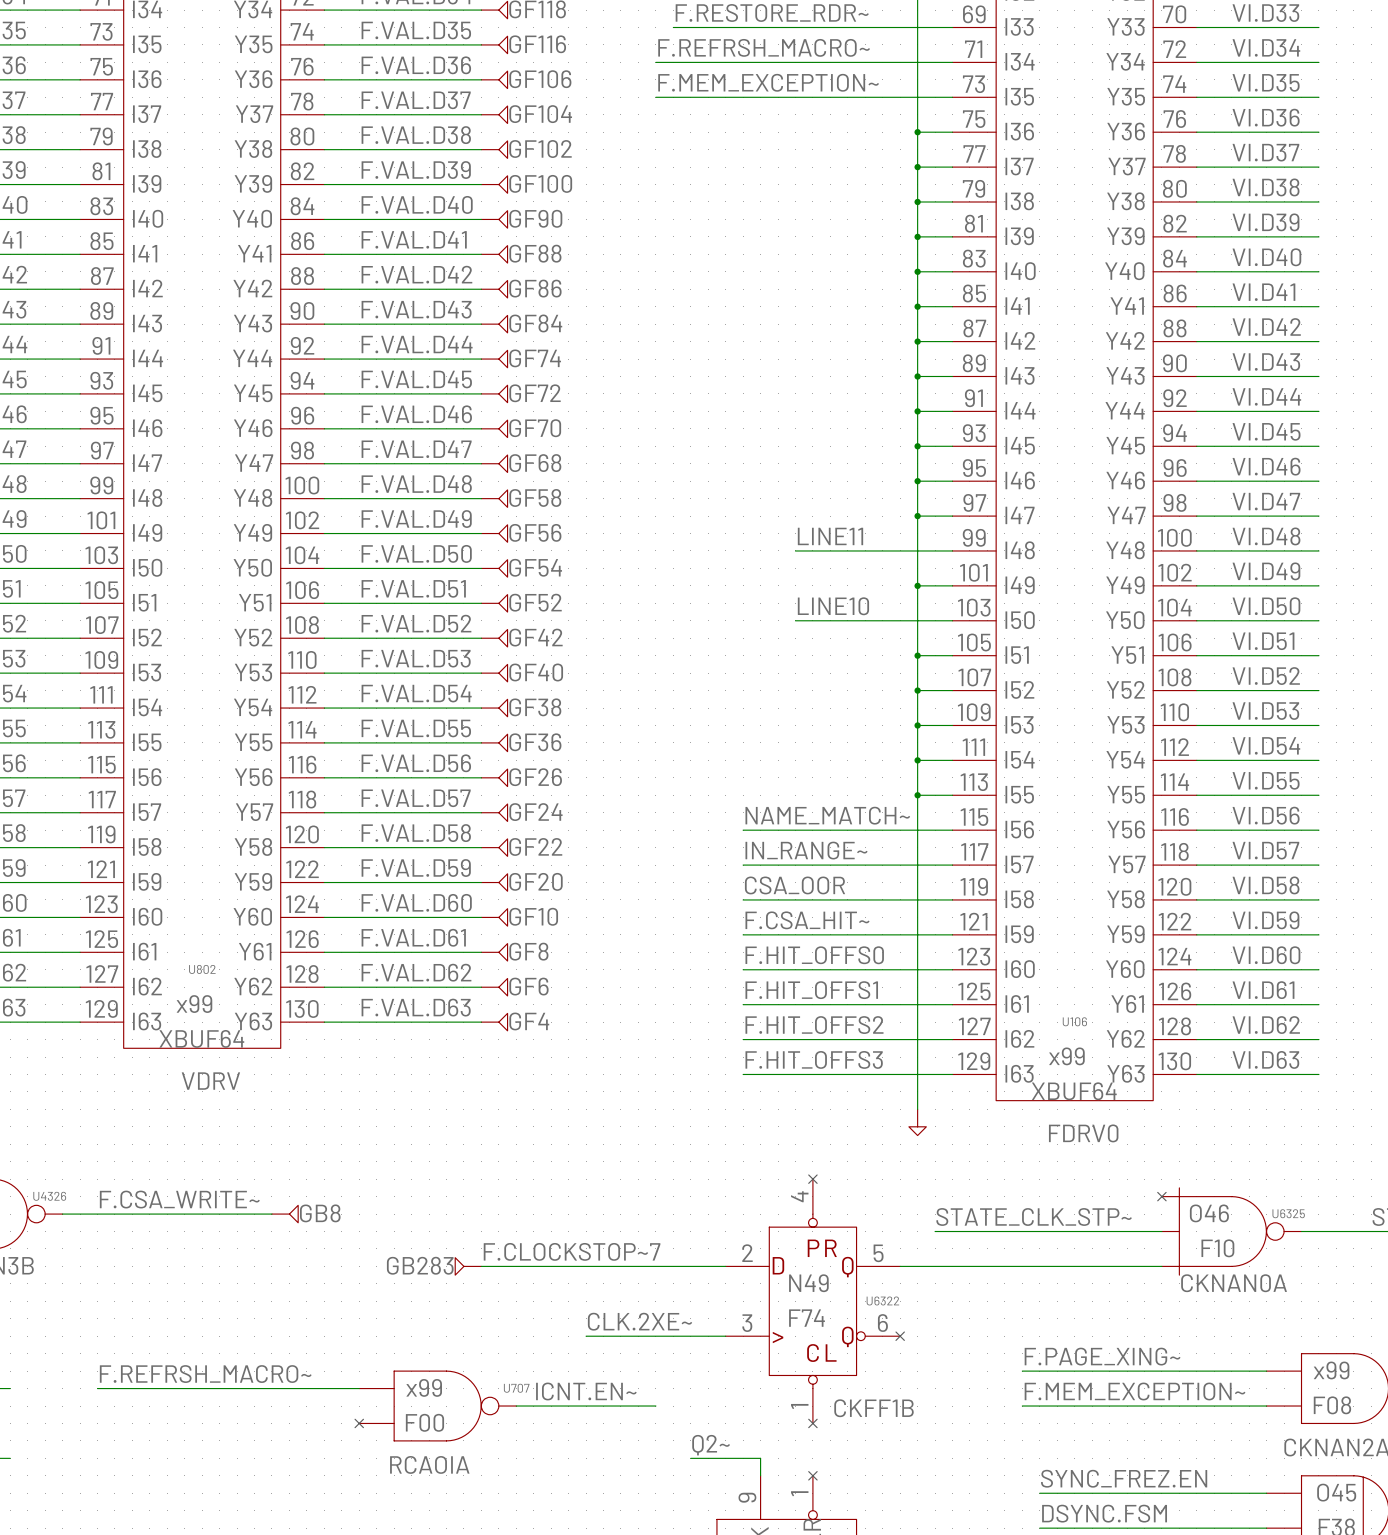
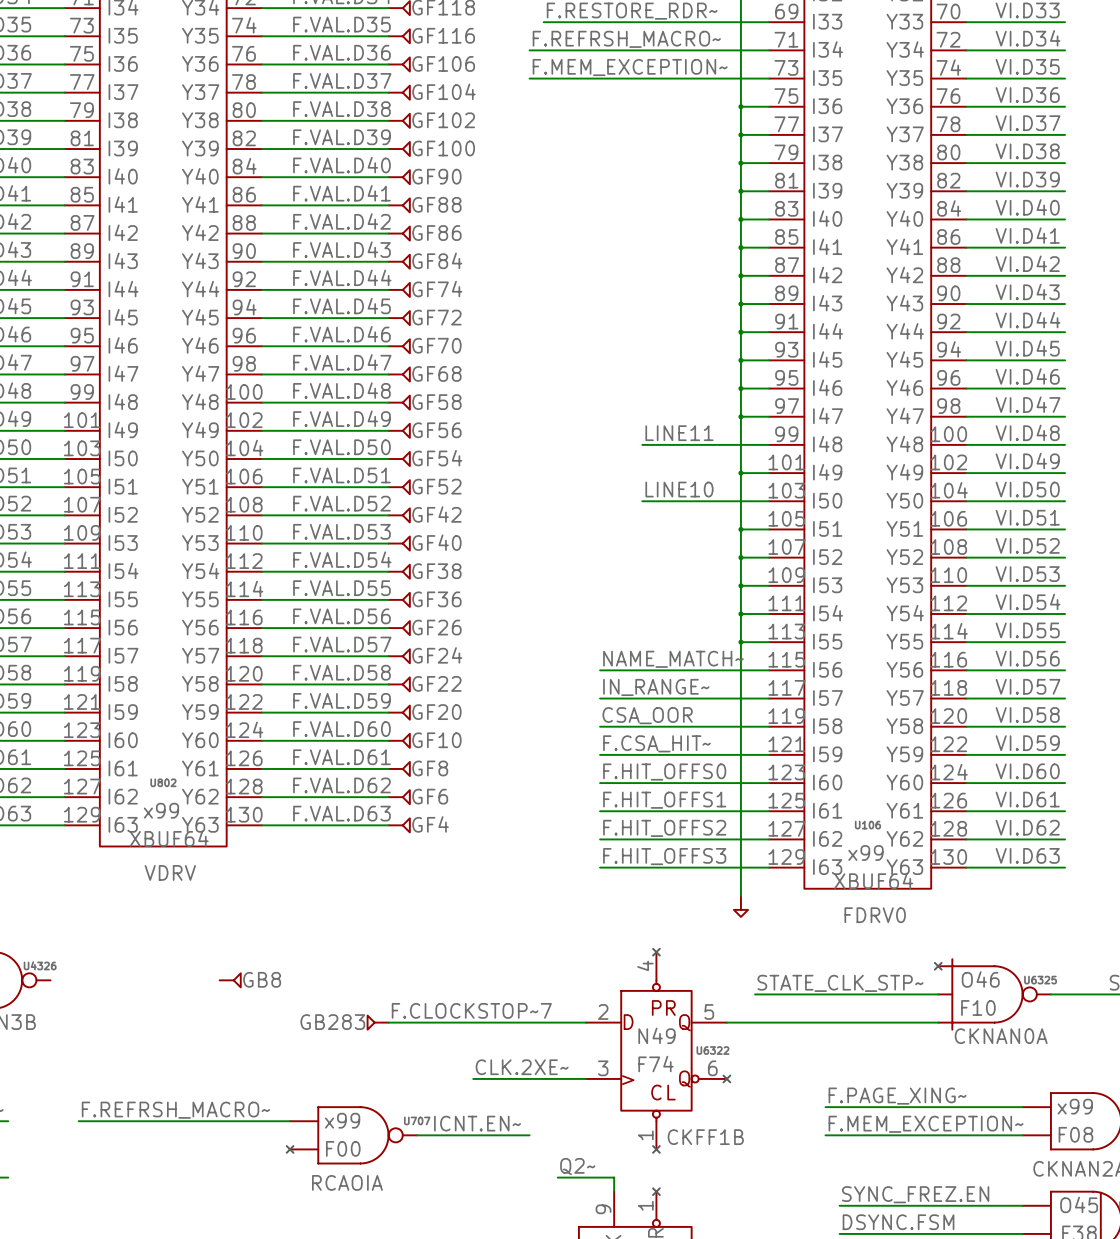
label: F.CSA_WRITE~ (179, 1199) -> none
wire: (62, 1214) (271, 1214) -> none

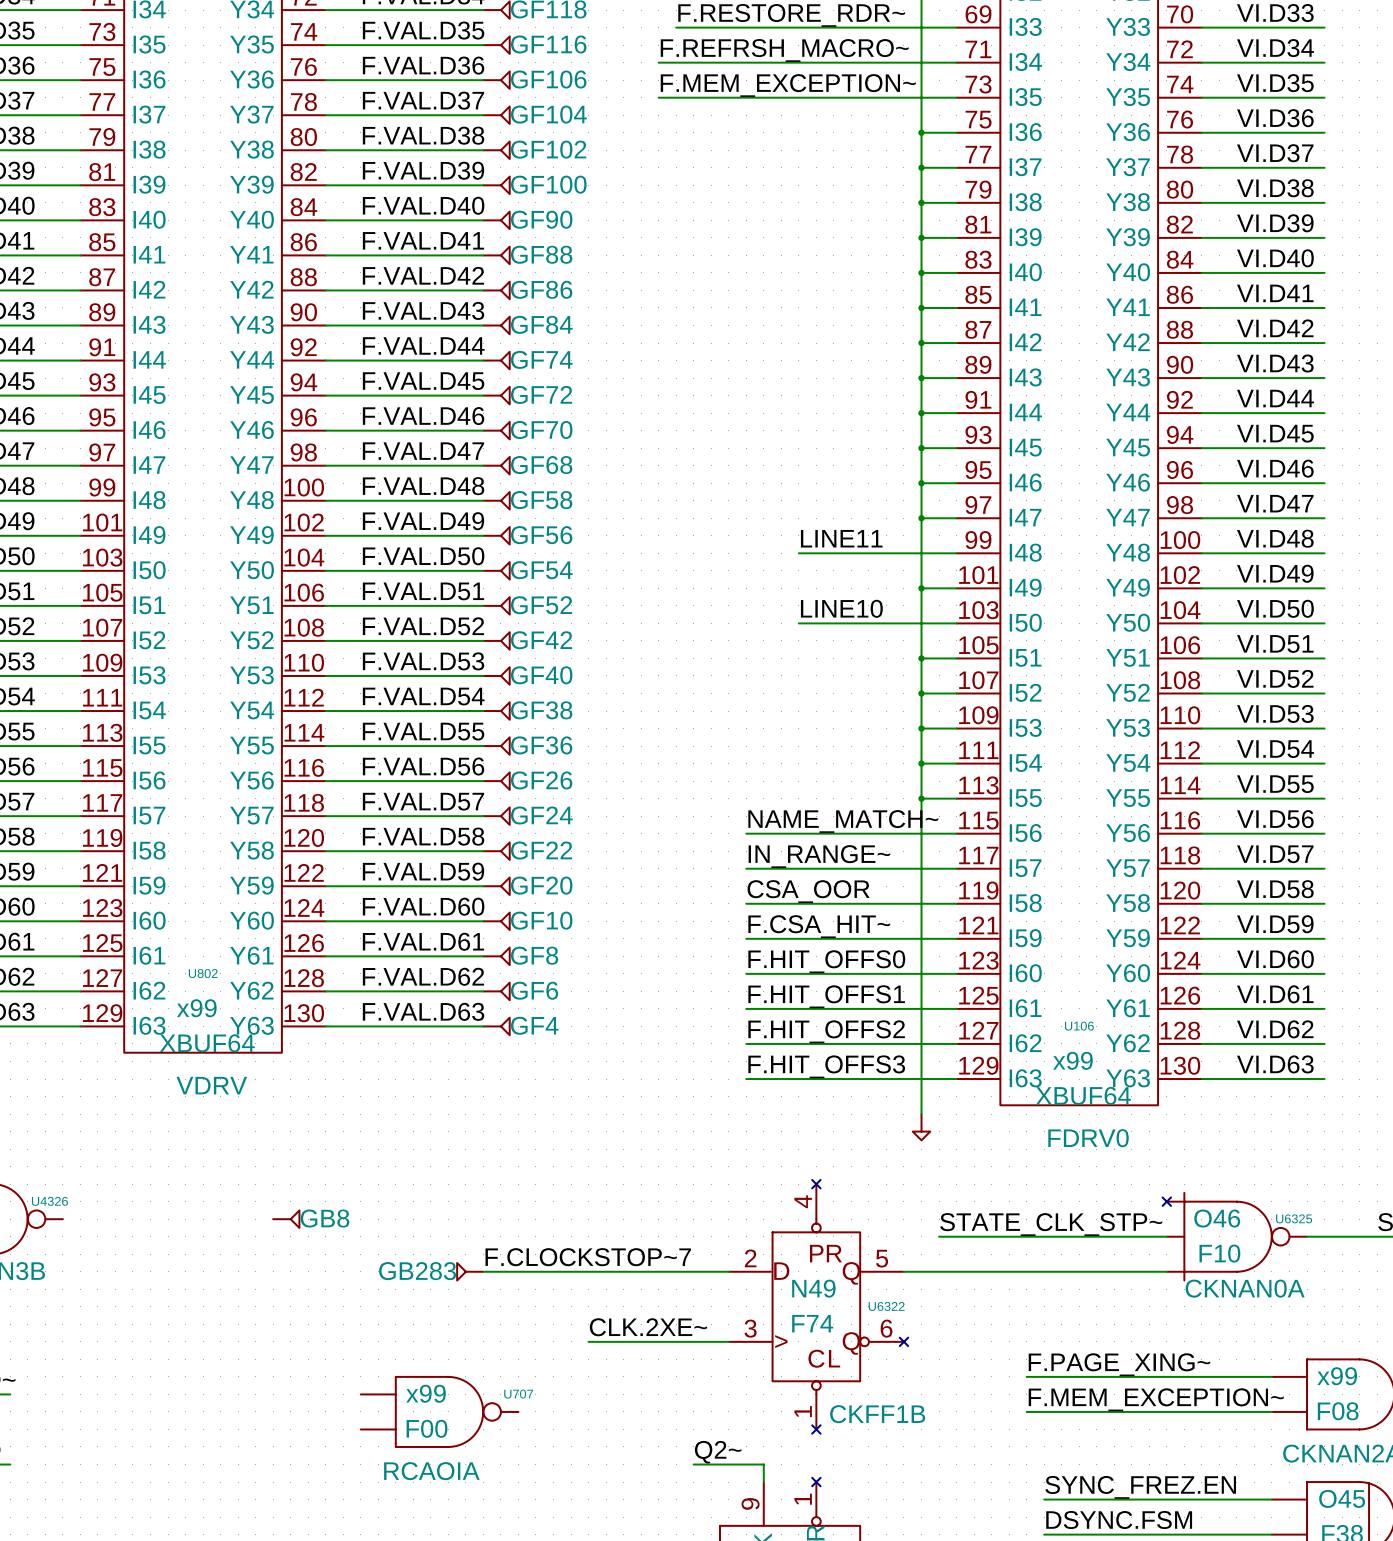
label: F.REFRSH_MACRO~ (175, 1110) -> none
wire: (78, 1121) (290, 1121) -> none
label: ICNT.EN~ (477, 1123) -> none
wire: (416, 1135) (529, 1135) -> none
no-connect mark: (290, 1149) -> none

